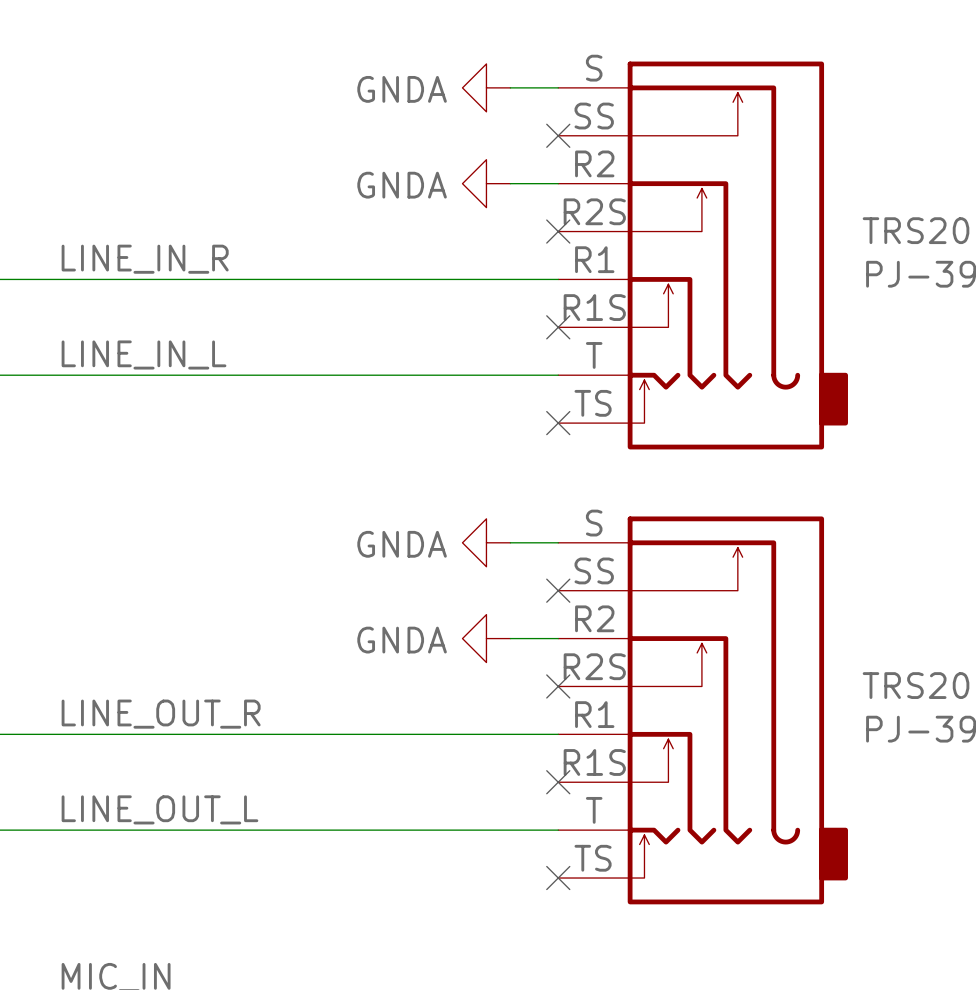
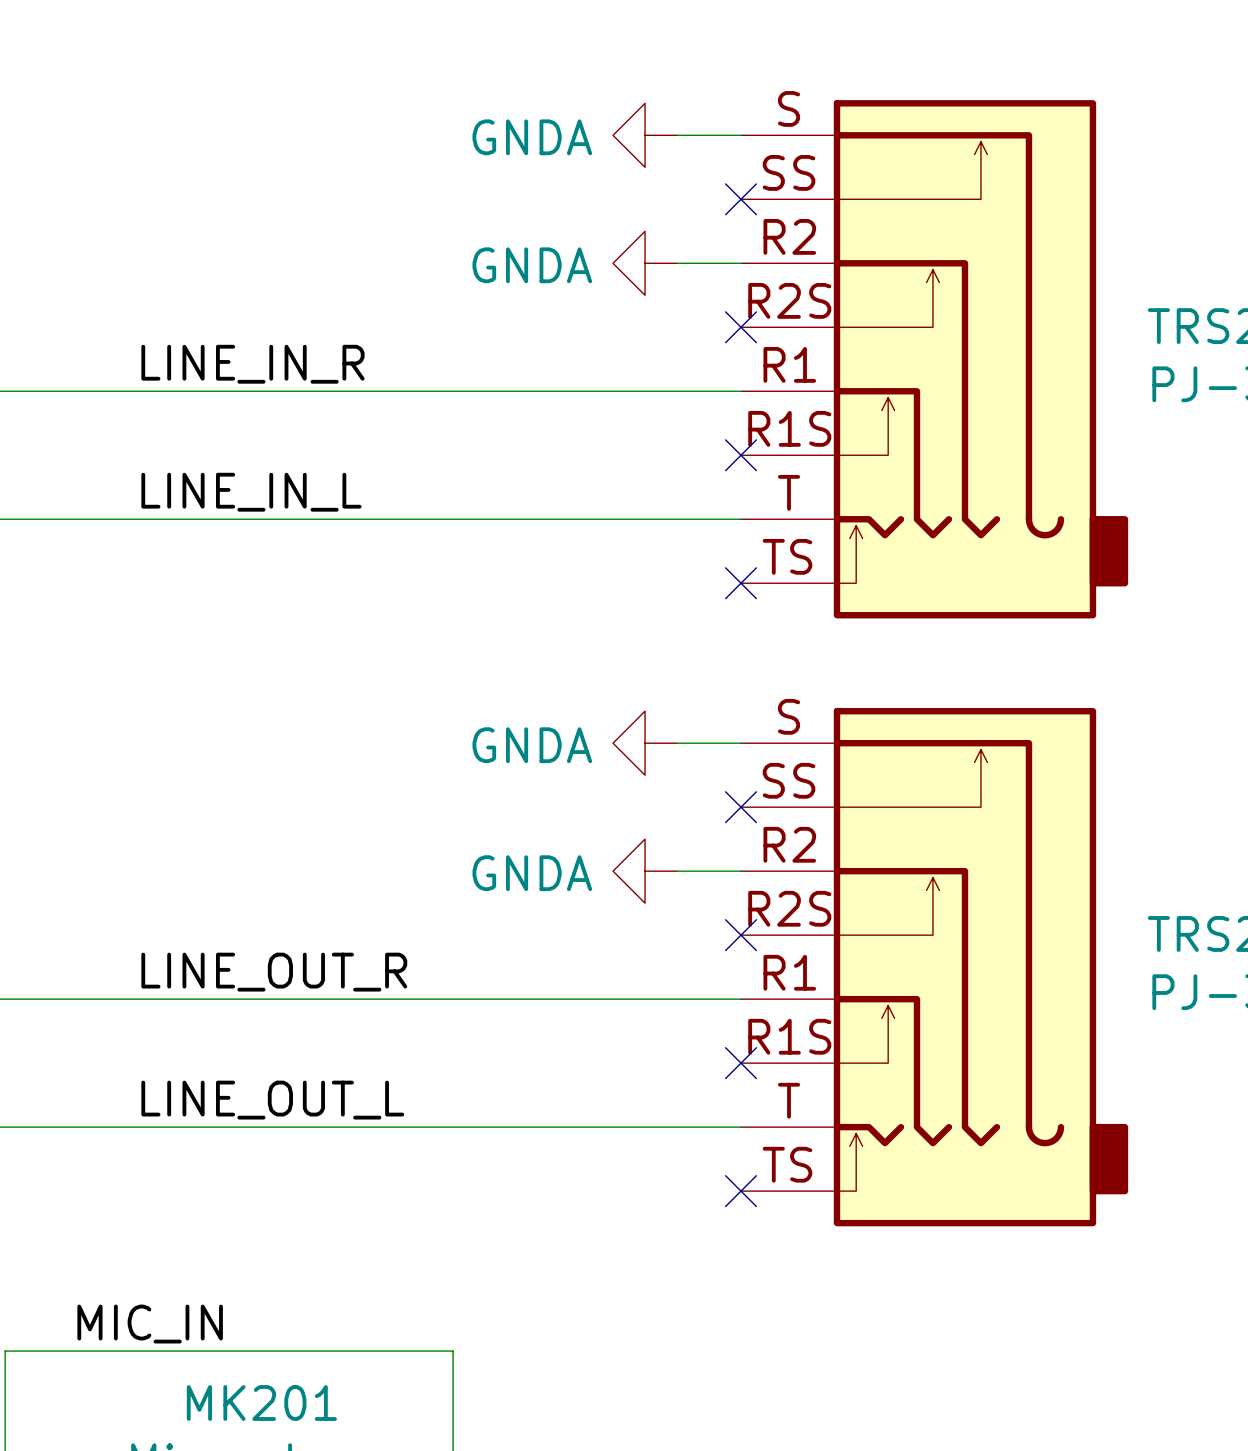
label position: LINE_IN_R (145, 259) -> LINE_IN_R (252, 364)
label position: LINE_IN_L (144, 354) -> LINE_IN_L (251, 492)
label position: LINE_OUT_R (161, 714) -> LINE_OUT_R (274, 972)
label position: LINE_OUT_L (159, 809) -> LINE_OUT_L (272, 1100)

